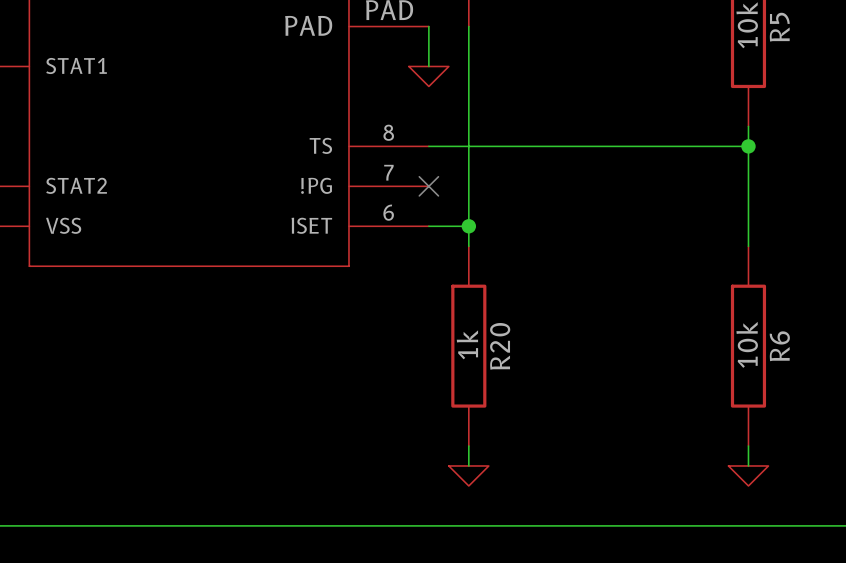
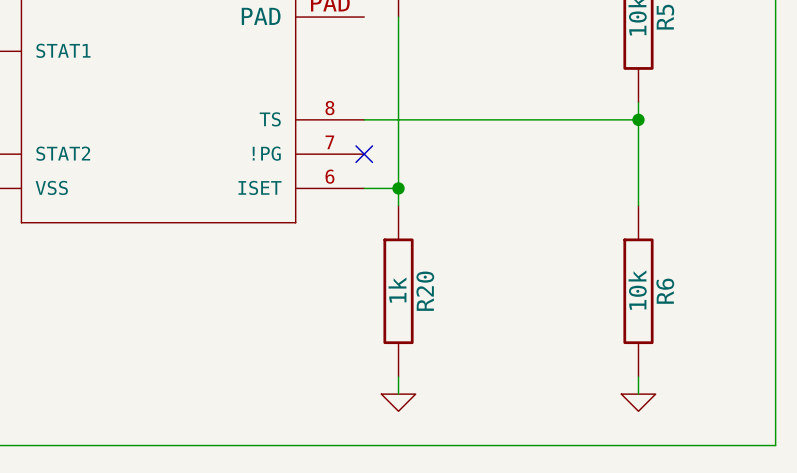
wire: (428, 26) (428, 66) -> none
power symbol: (428, 76) -> none

